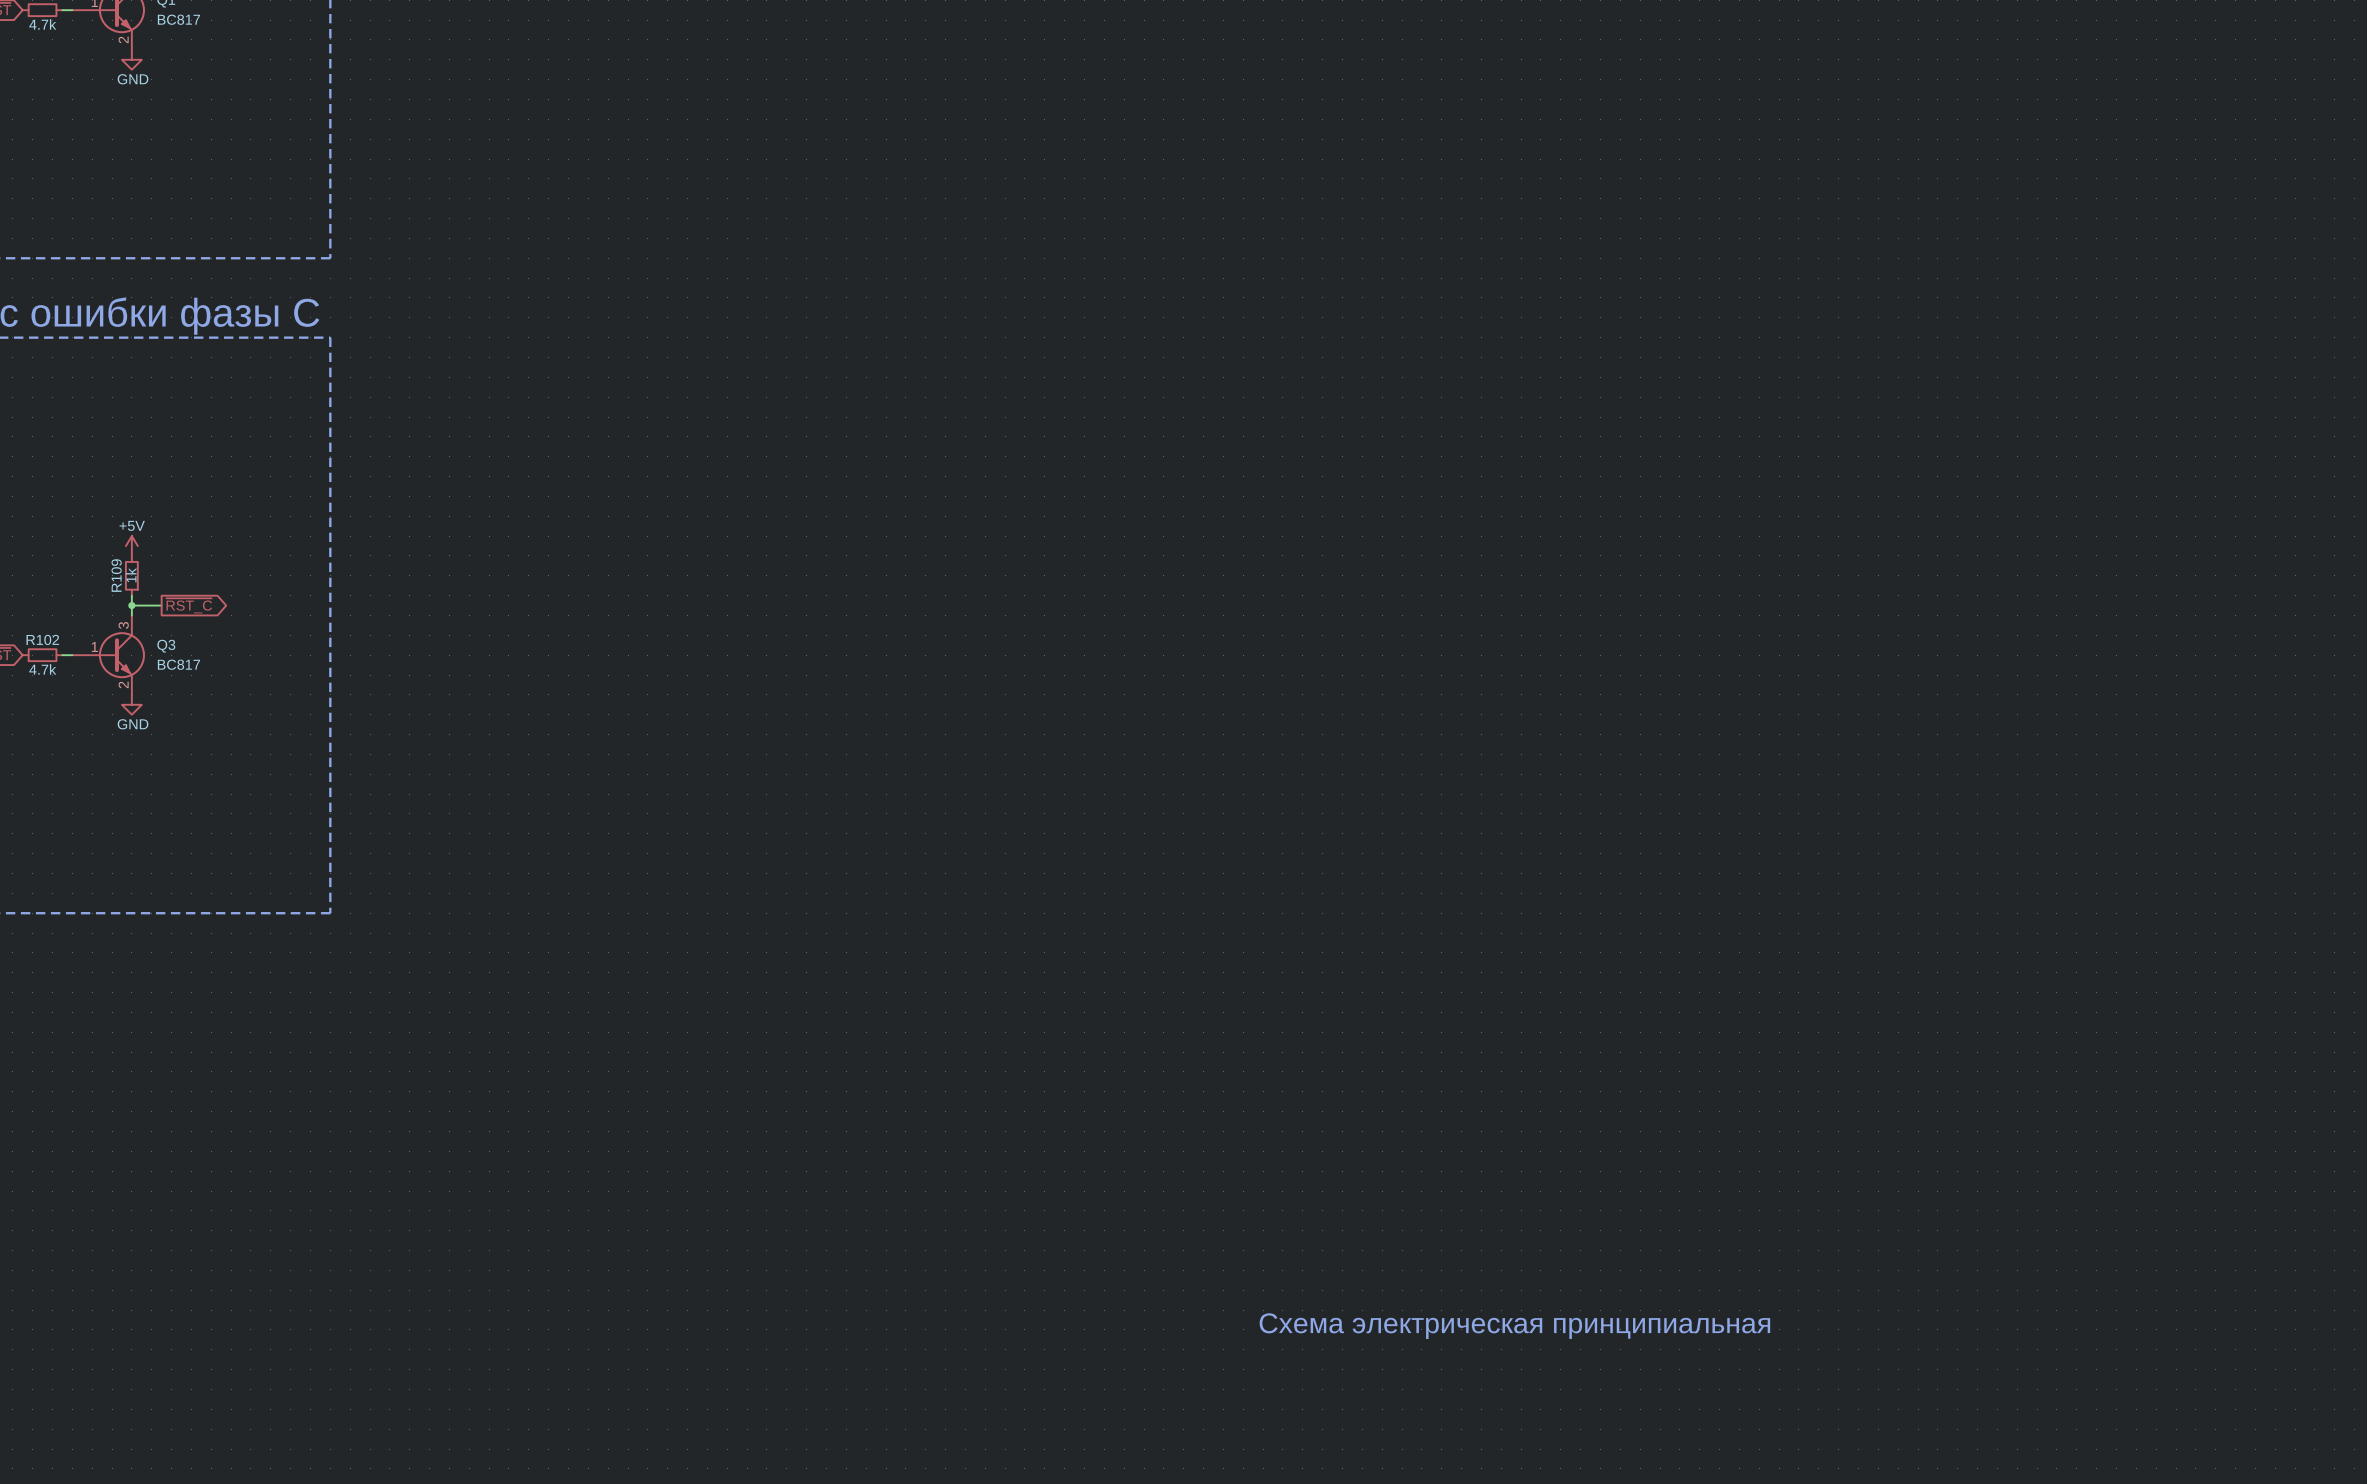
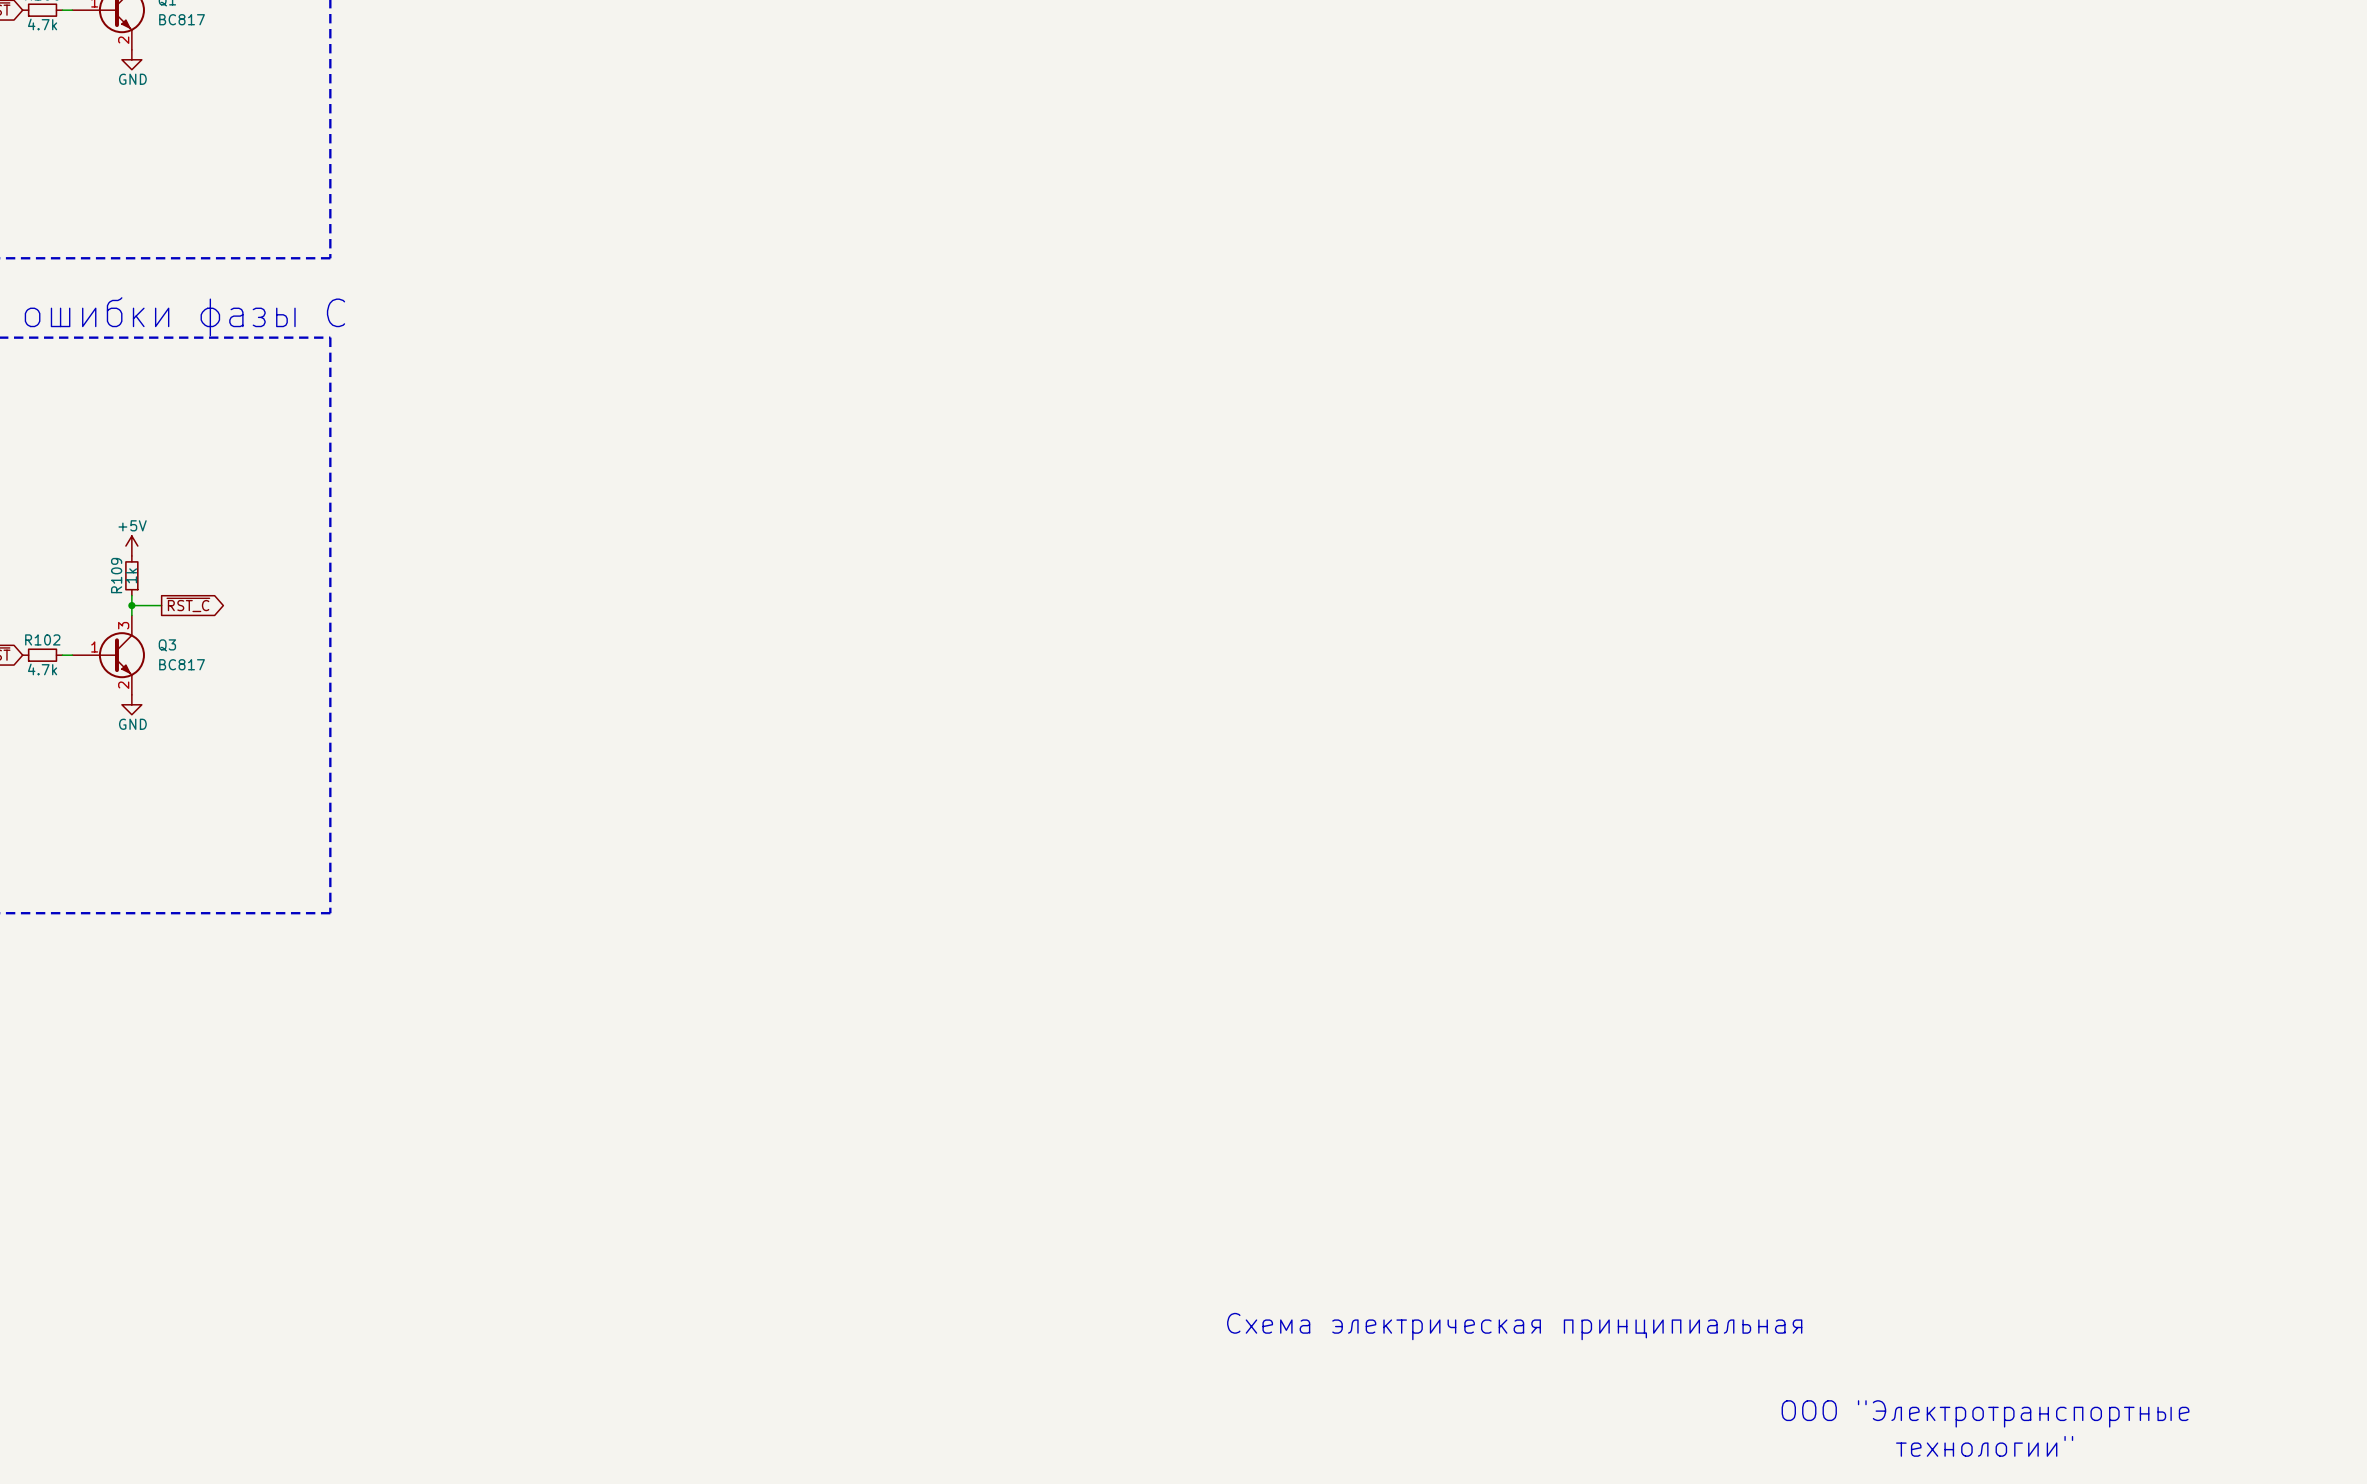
text: none -> ООО "Электротранспортные (1985, 1413)
text: none -> технологии" (1984, 1446)

